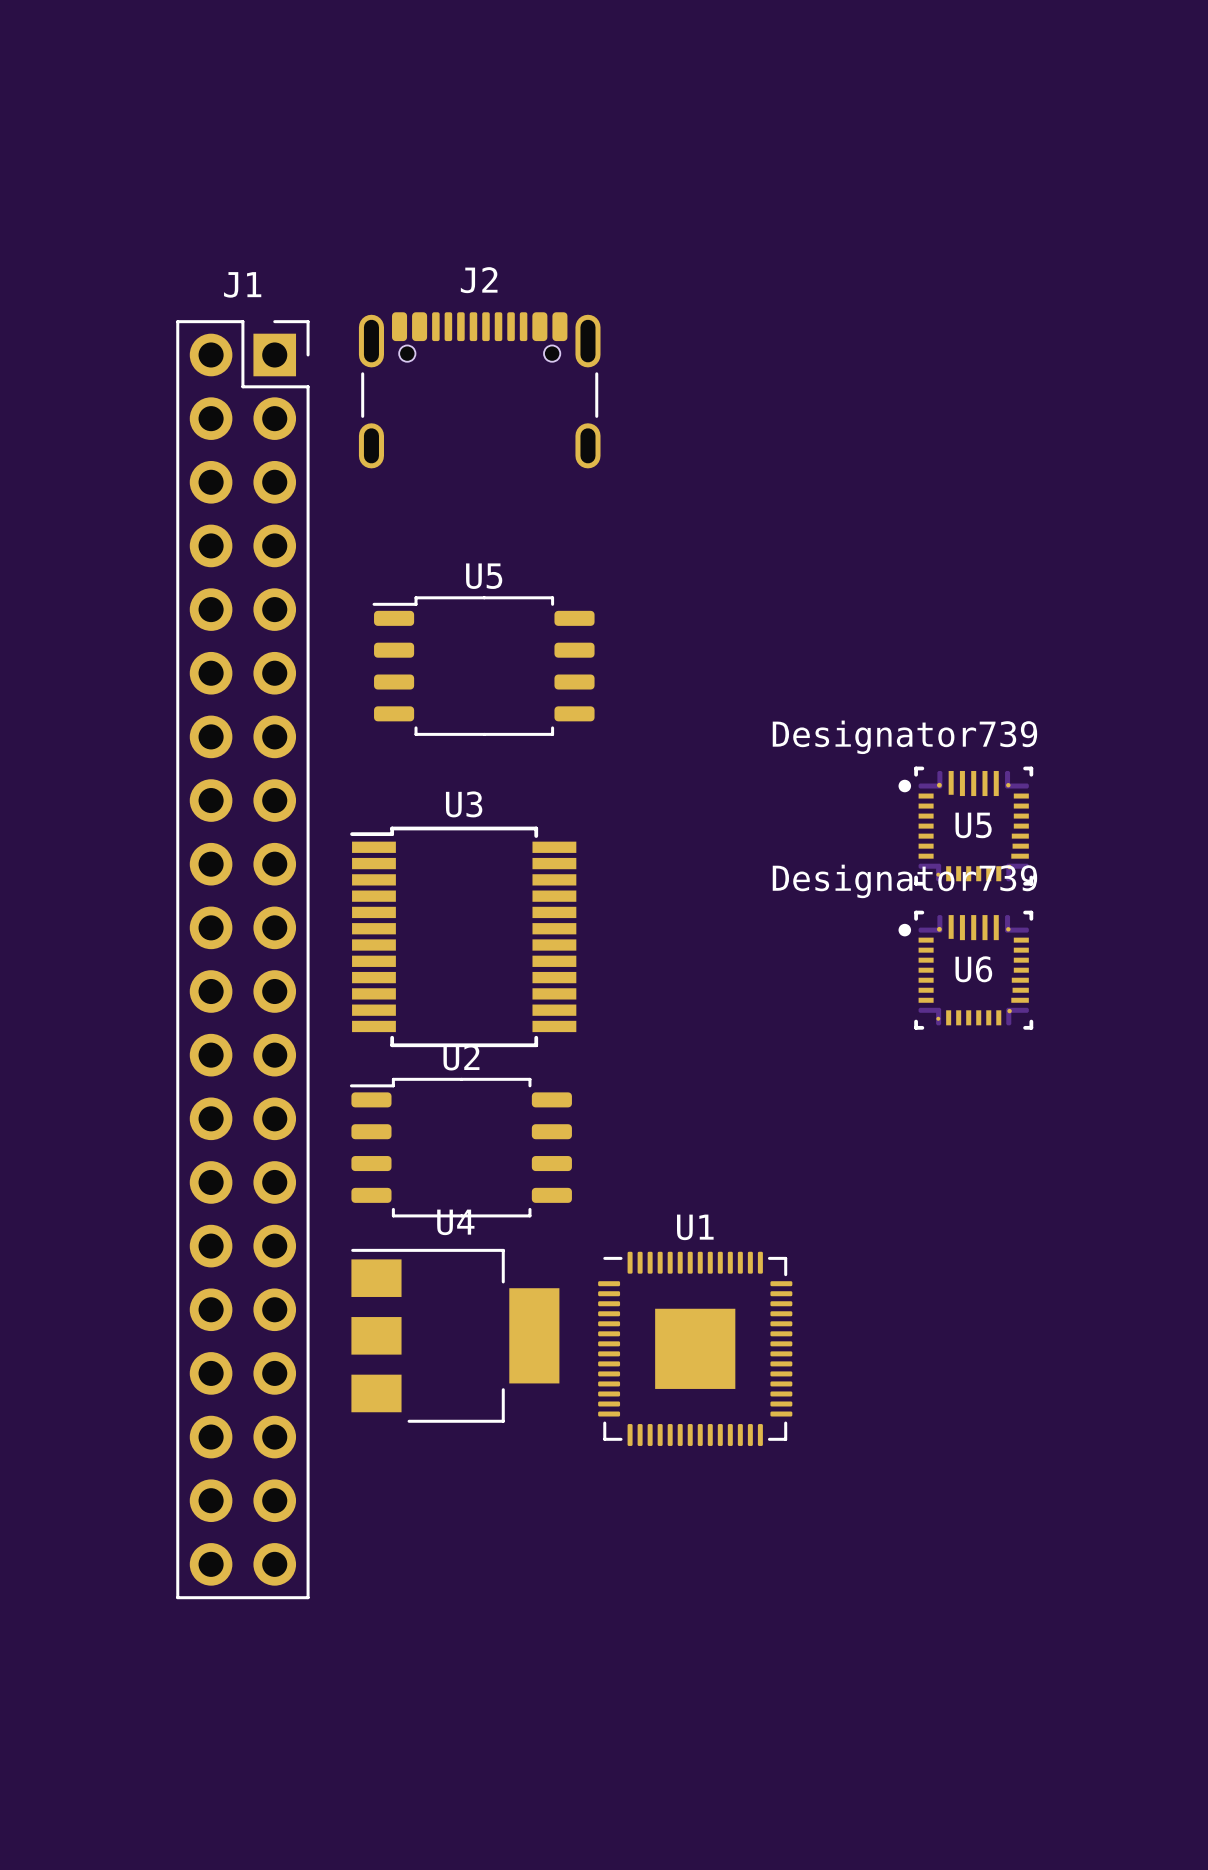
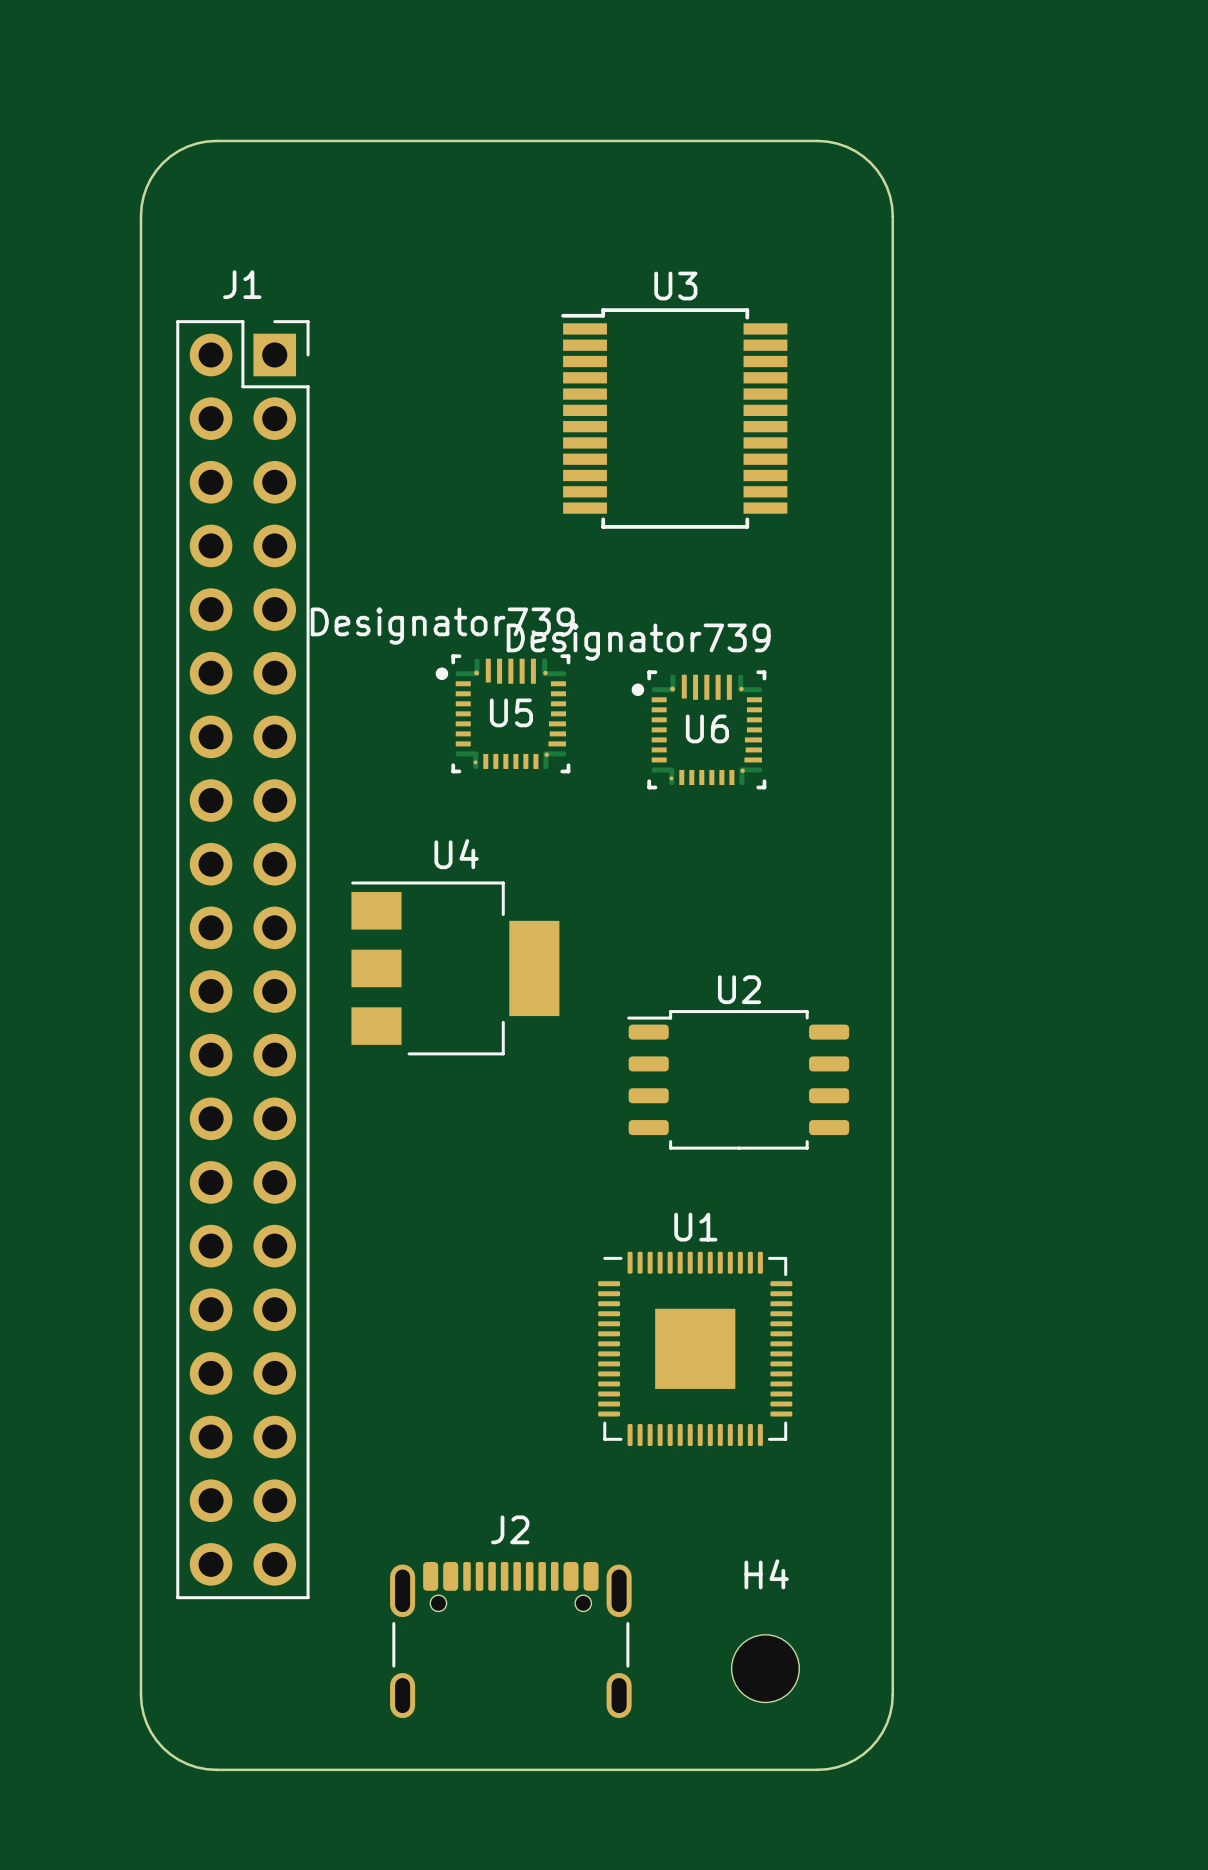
board edge: none -> (216, 140) (827, 141) (846, 146) (863, 156) (877, 170) (887, 187) (892, 216) (892, 1694) (890, 1714) (882, 1732) (863, 1754) (846, 1764) (817, 1769) (216, 1769) (187, 1764) (170, 1754) (156, 1740) (146, 1723) (140, 1694) (140, 216) (146, 187) (162, 162) (187, 146) (216, 140)
J2 position: (479, 390) -> (510, 1640)
U5: (483, 666) -> none
U5 position: (965, 826) -> (503, 713)
U3 position: (463, 936) -> (674, 418)
U6 position: (965, 970) -> (698, 729)
U2 position: (460, 1147) -> (738, 1079)
U4 position: (455, 1335) -> (455, 968)
H4: none -> (765, 1668)

